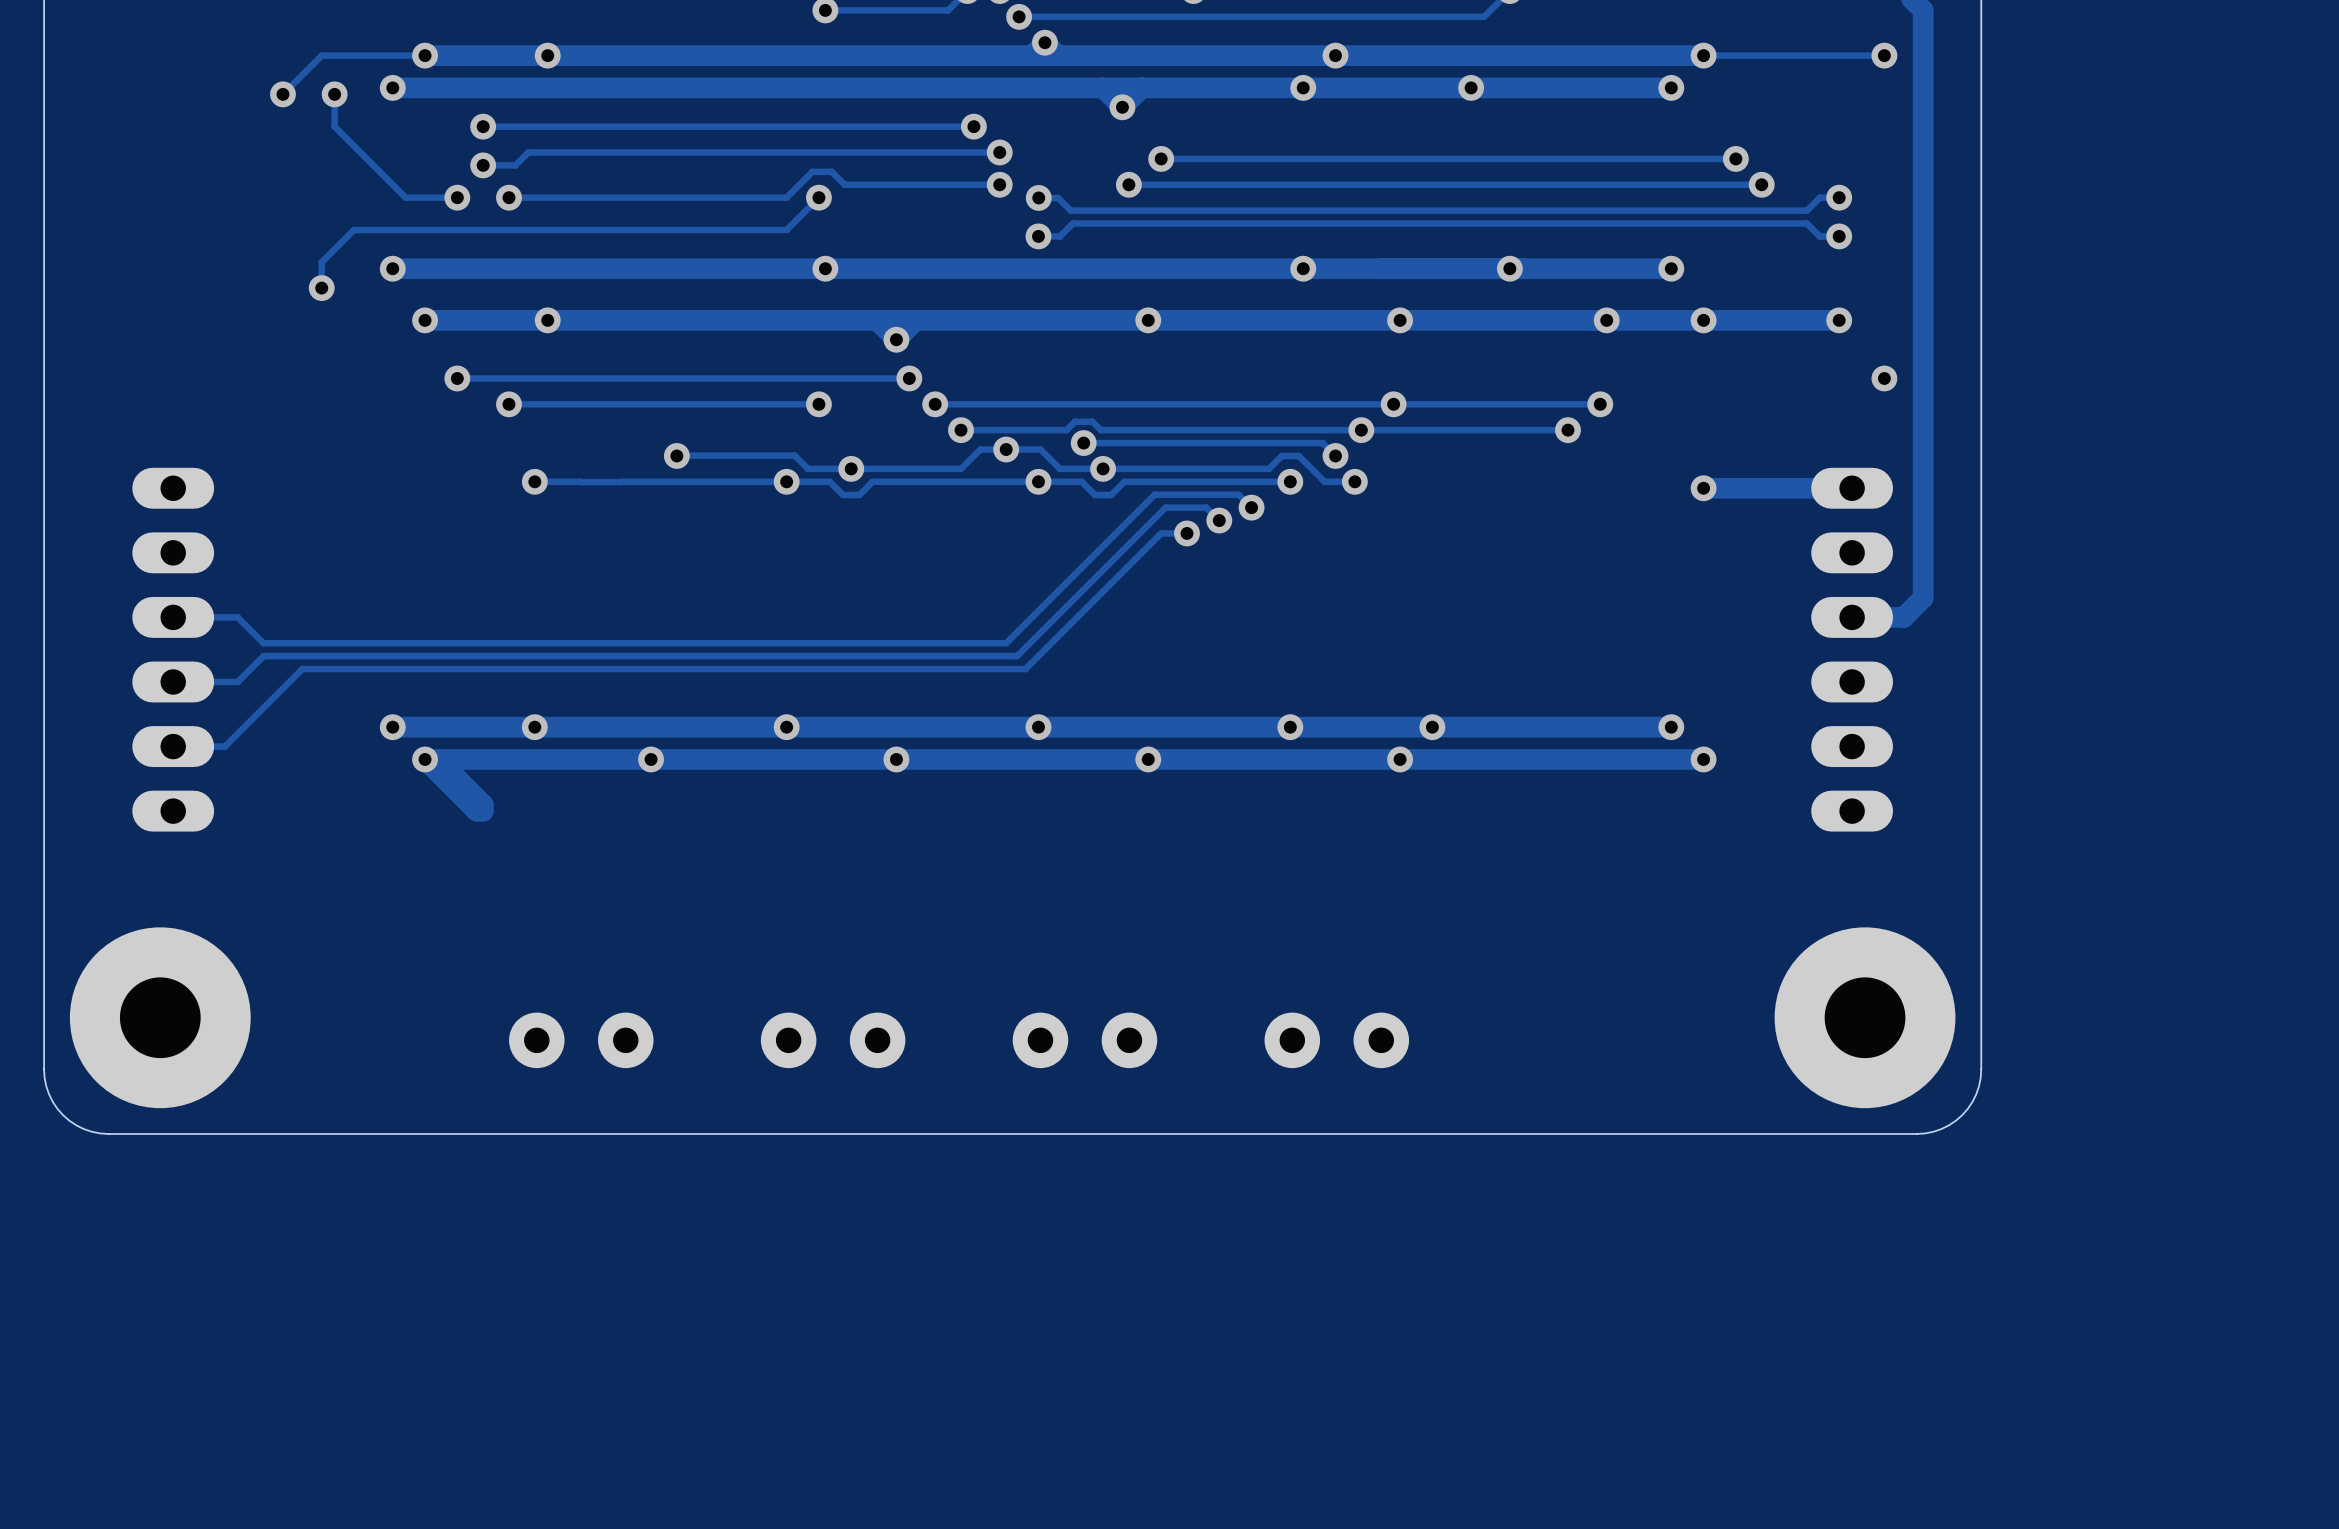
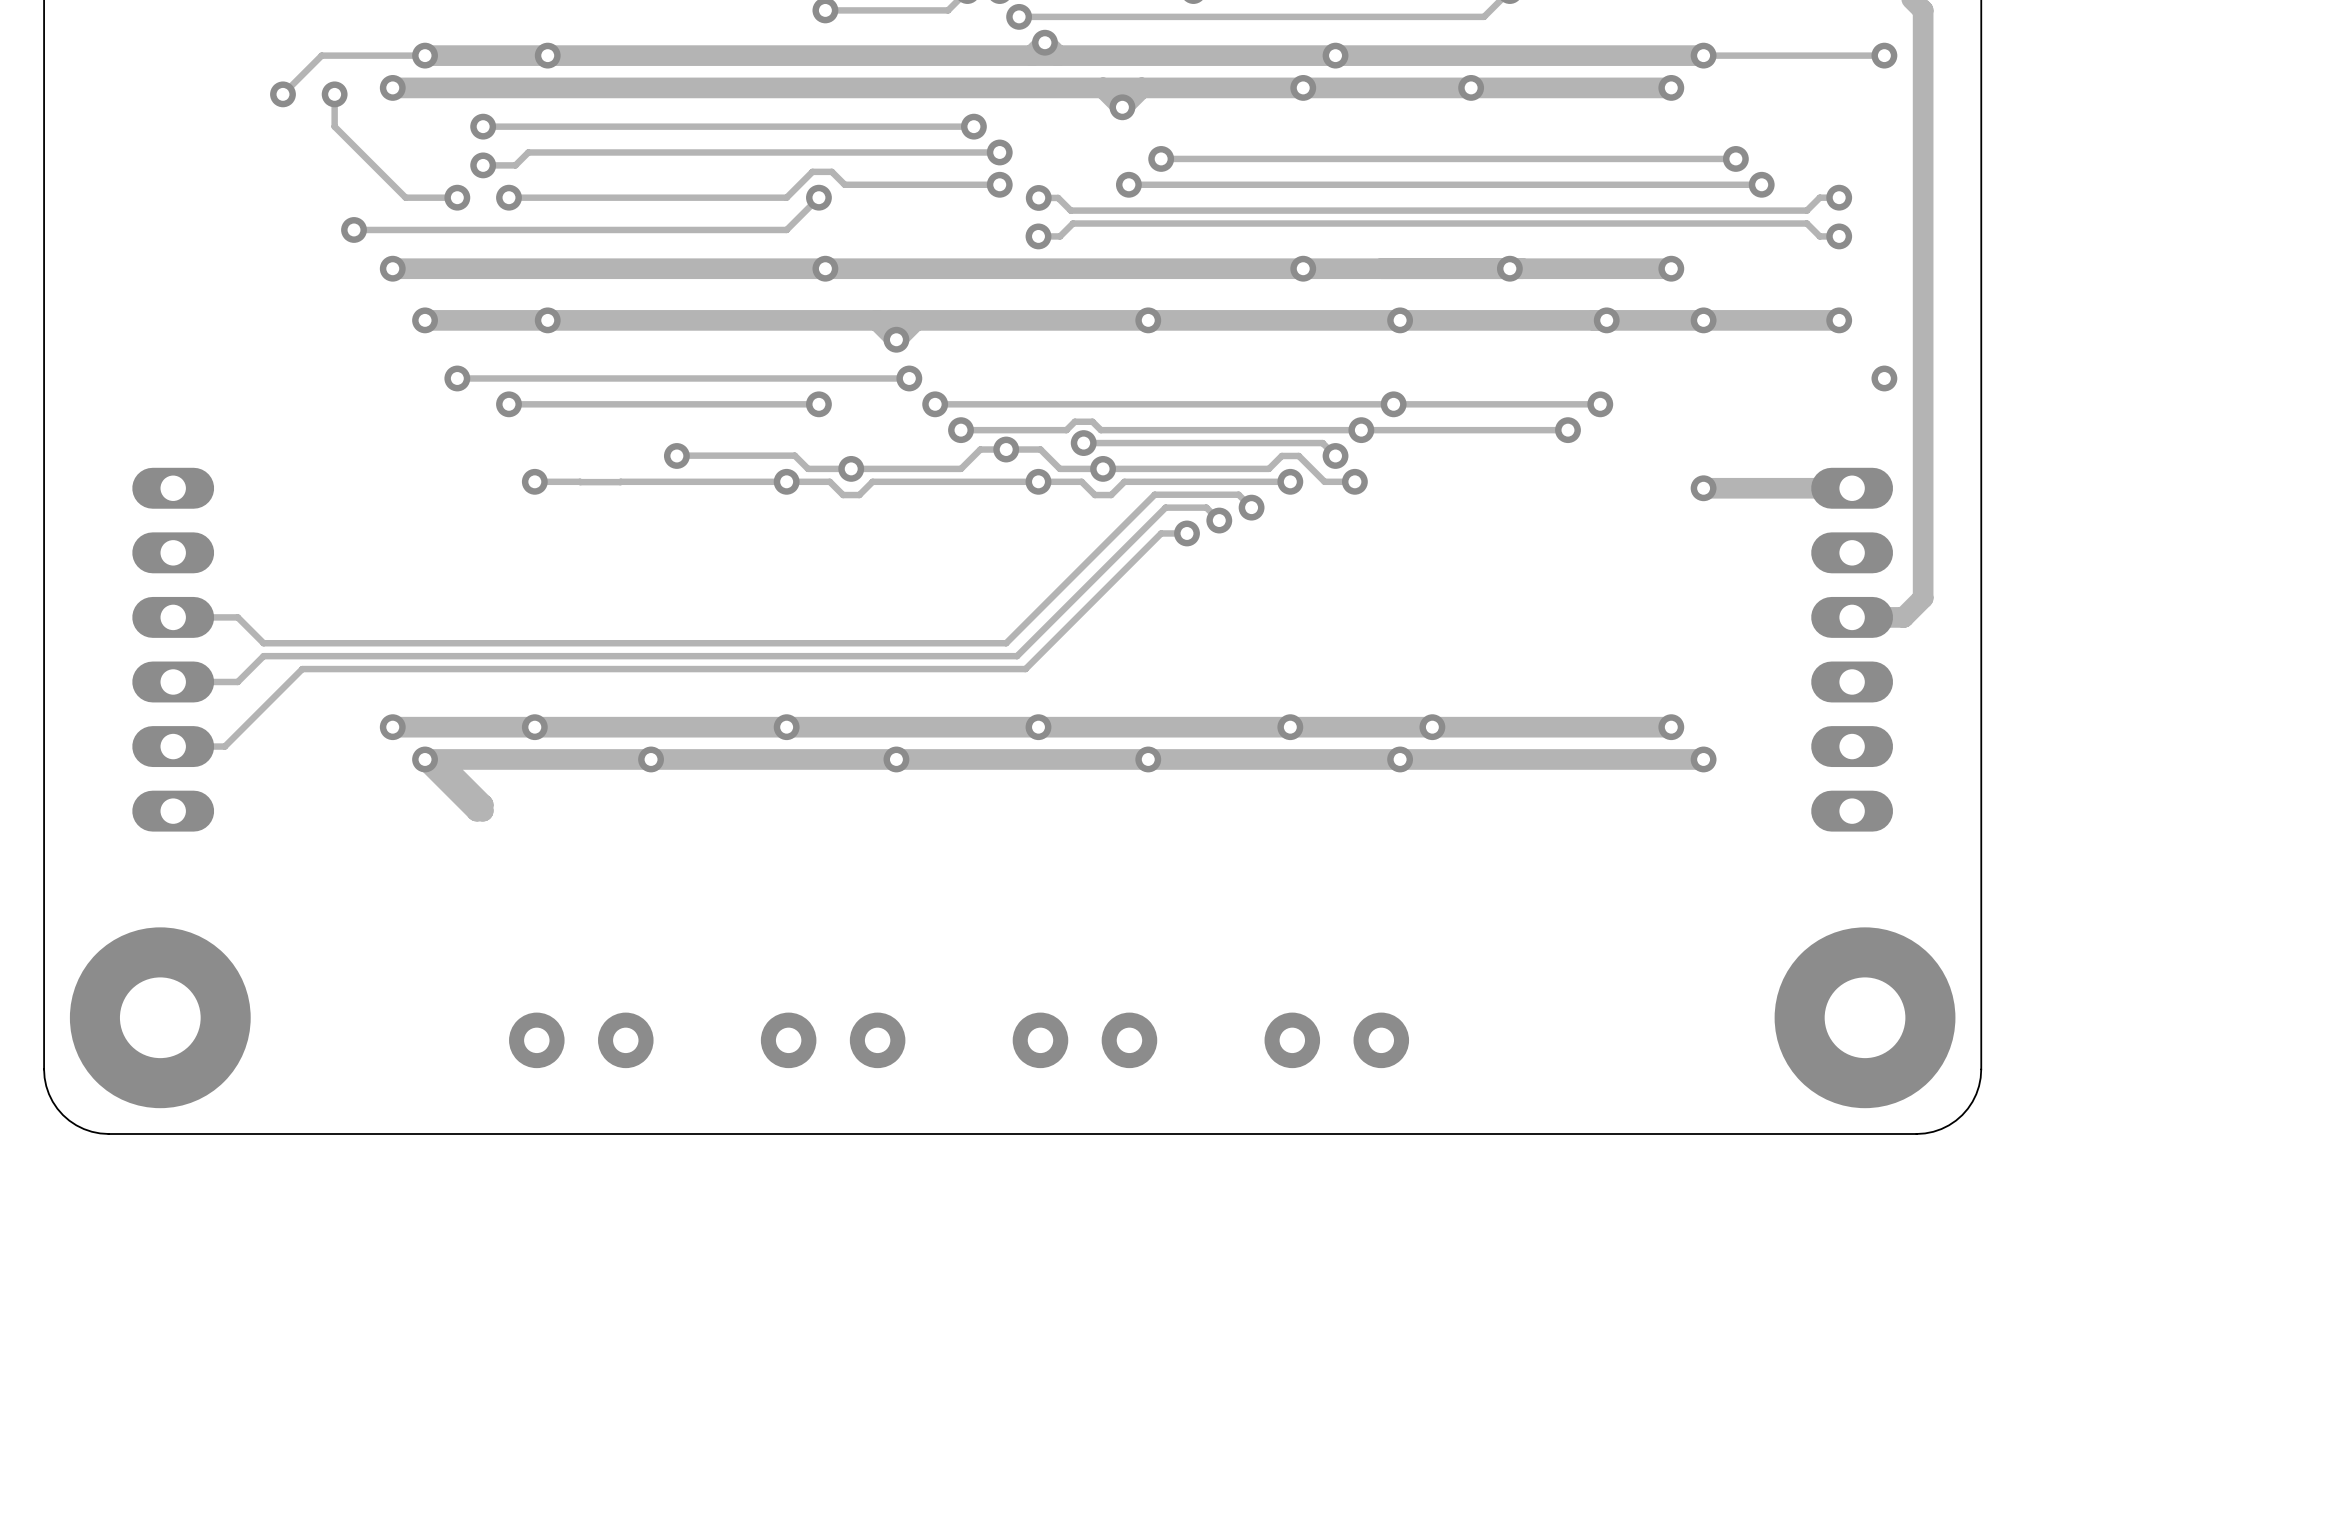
track: (354, 229) (321, 262) (321, 288) -> none
via position: (321, 288) -> (354, 229)

